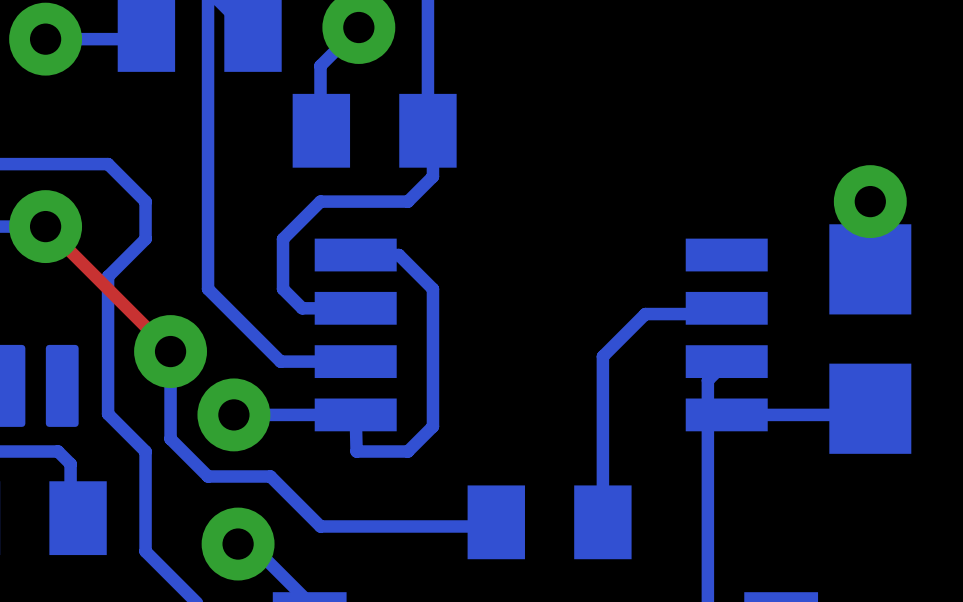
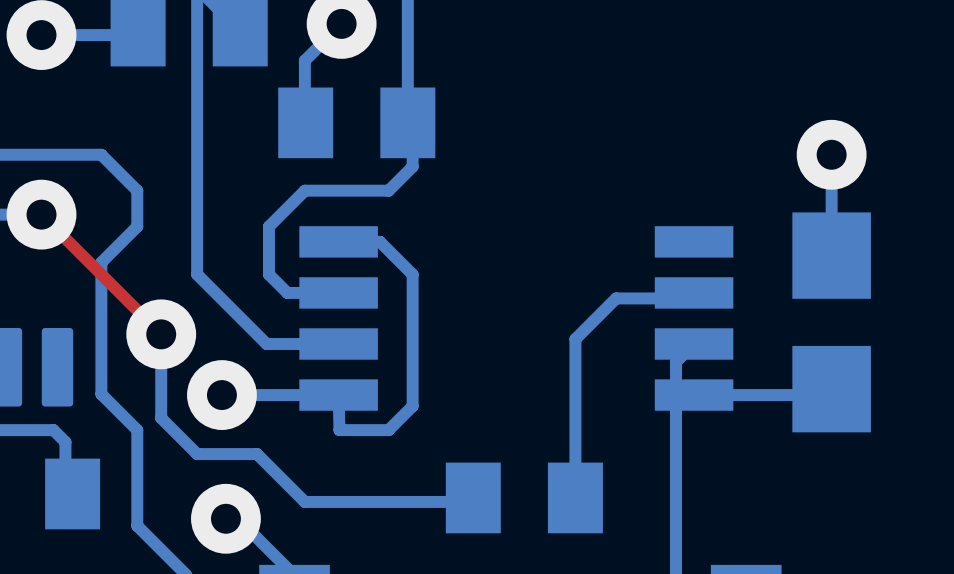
via position: (870, 201) -> (831, 154)

